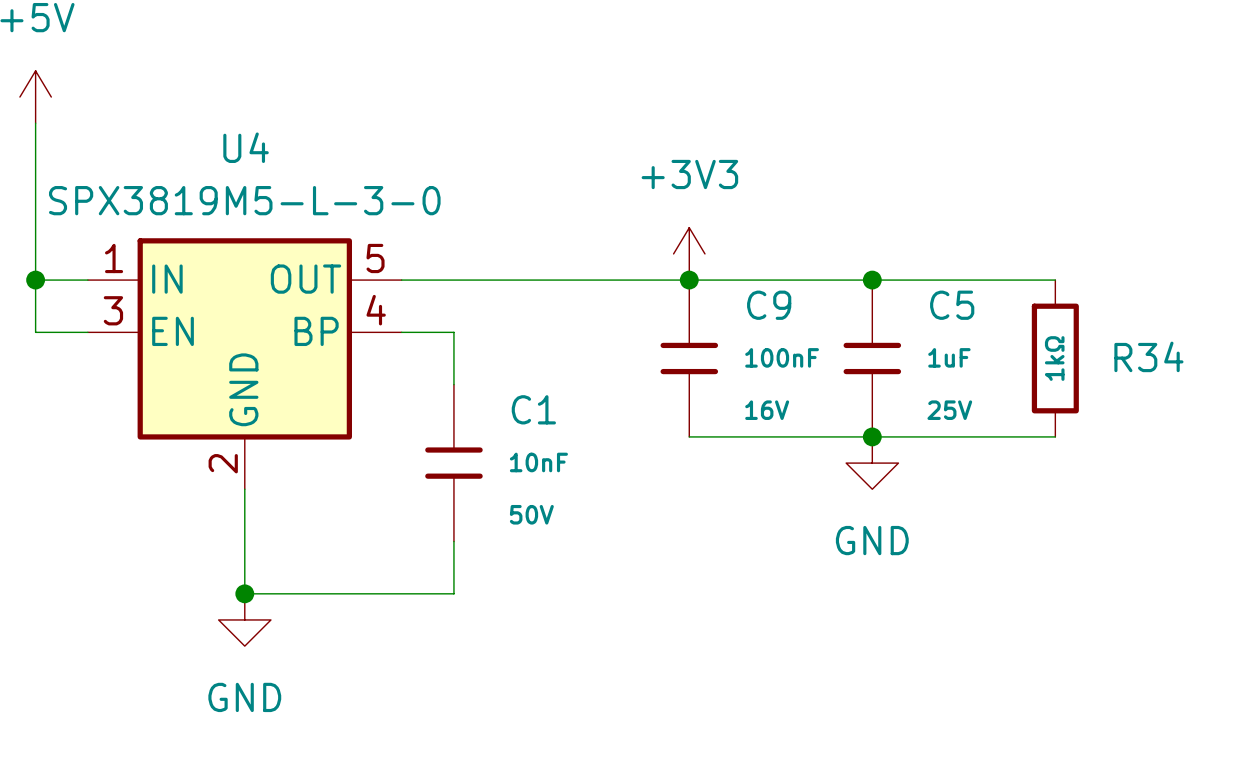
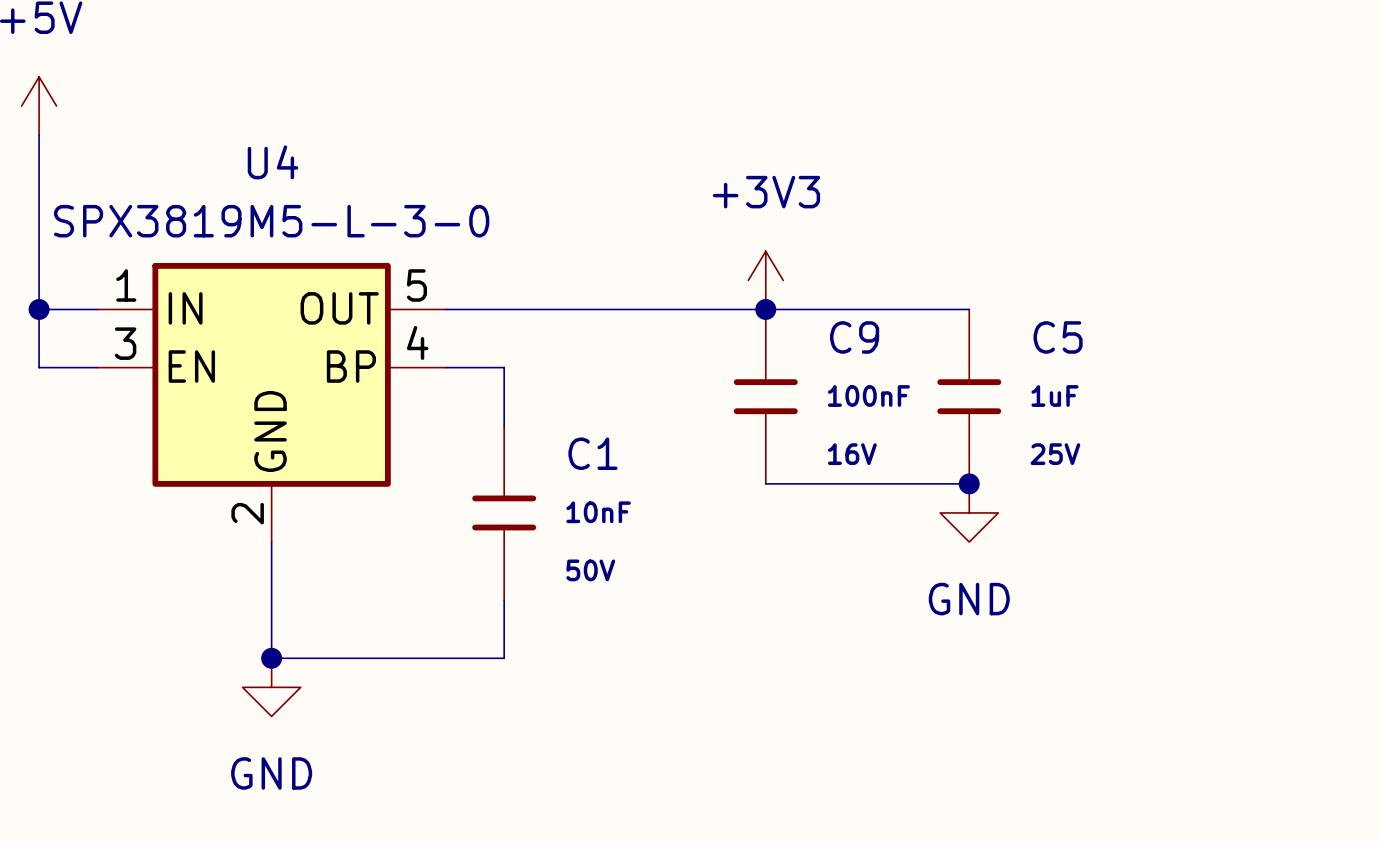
wire: (872, 280) (1055, 280) -> none
junction: (872, 280) -> none
R34: 1kΩ (1055, 358) -> none
wire: (872, 436) (1055, 436) -> none

